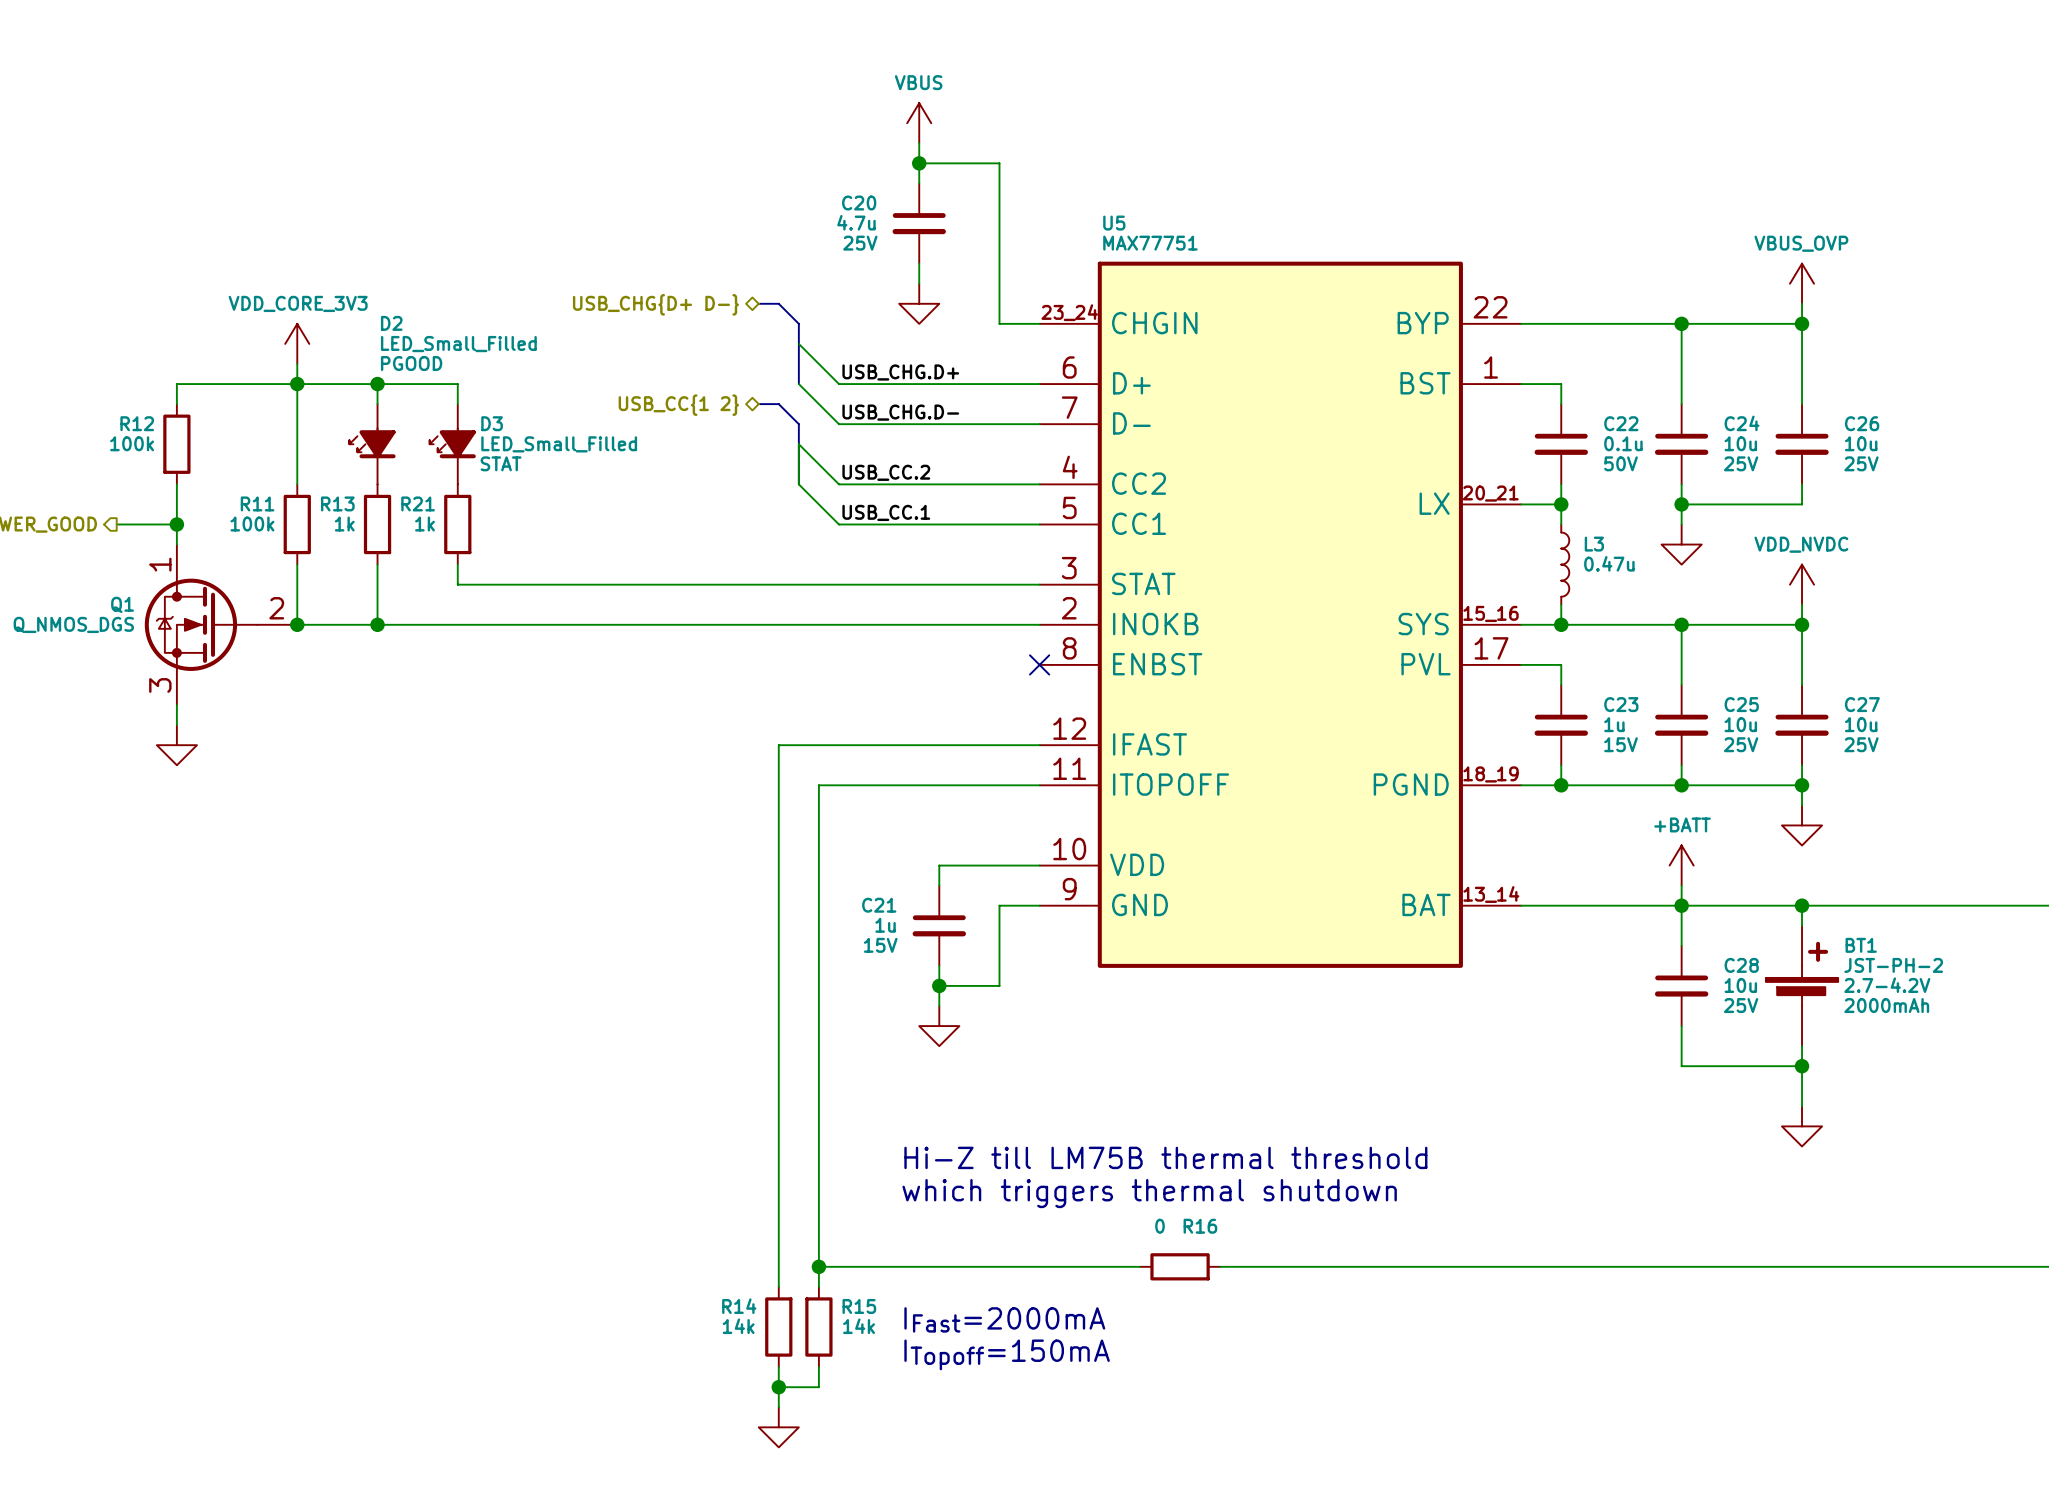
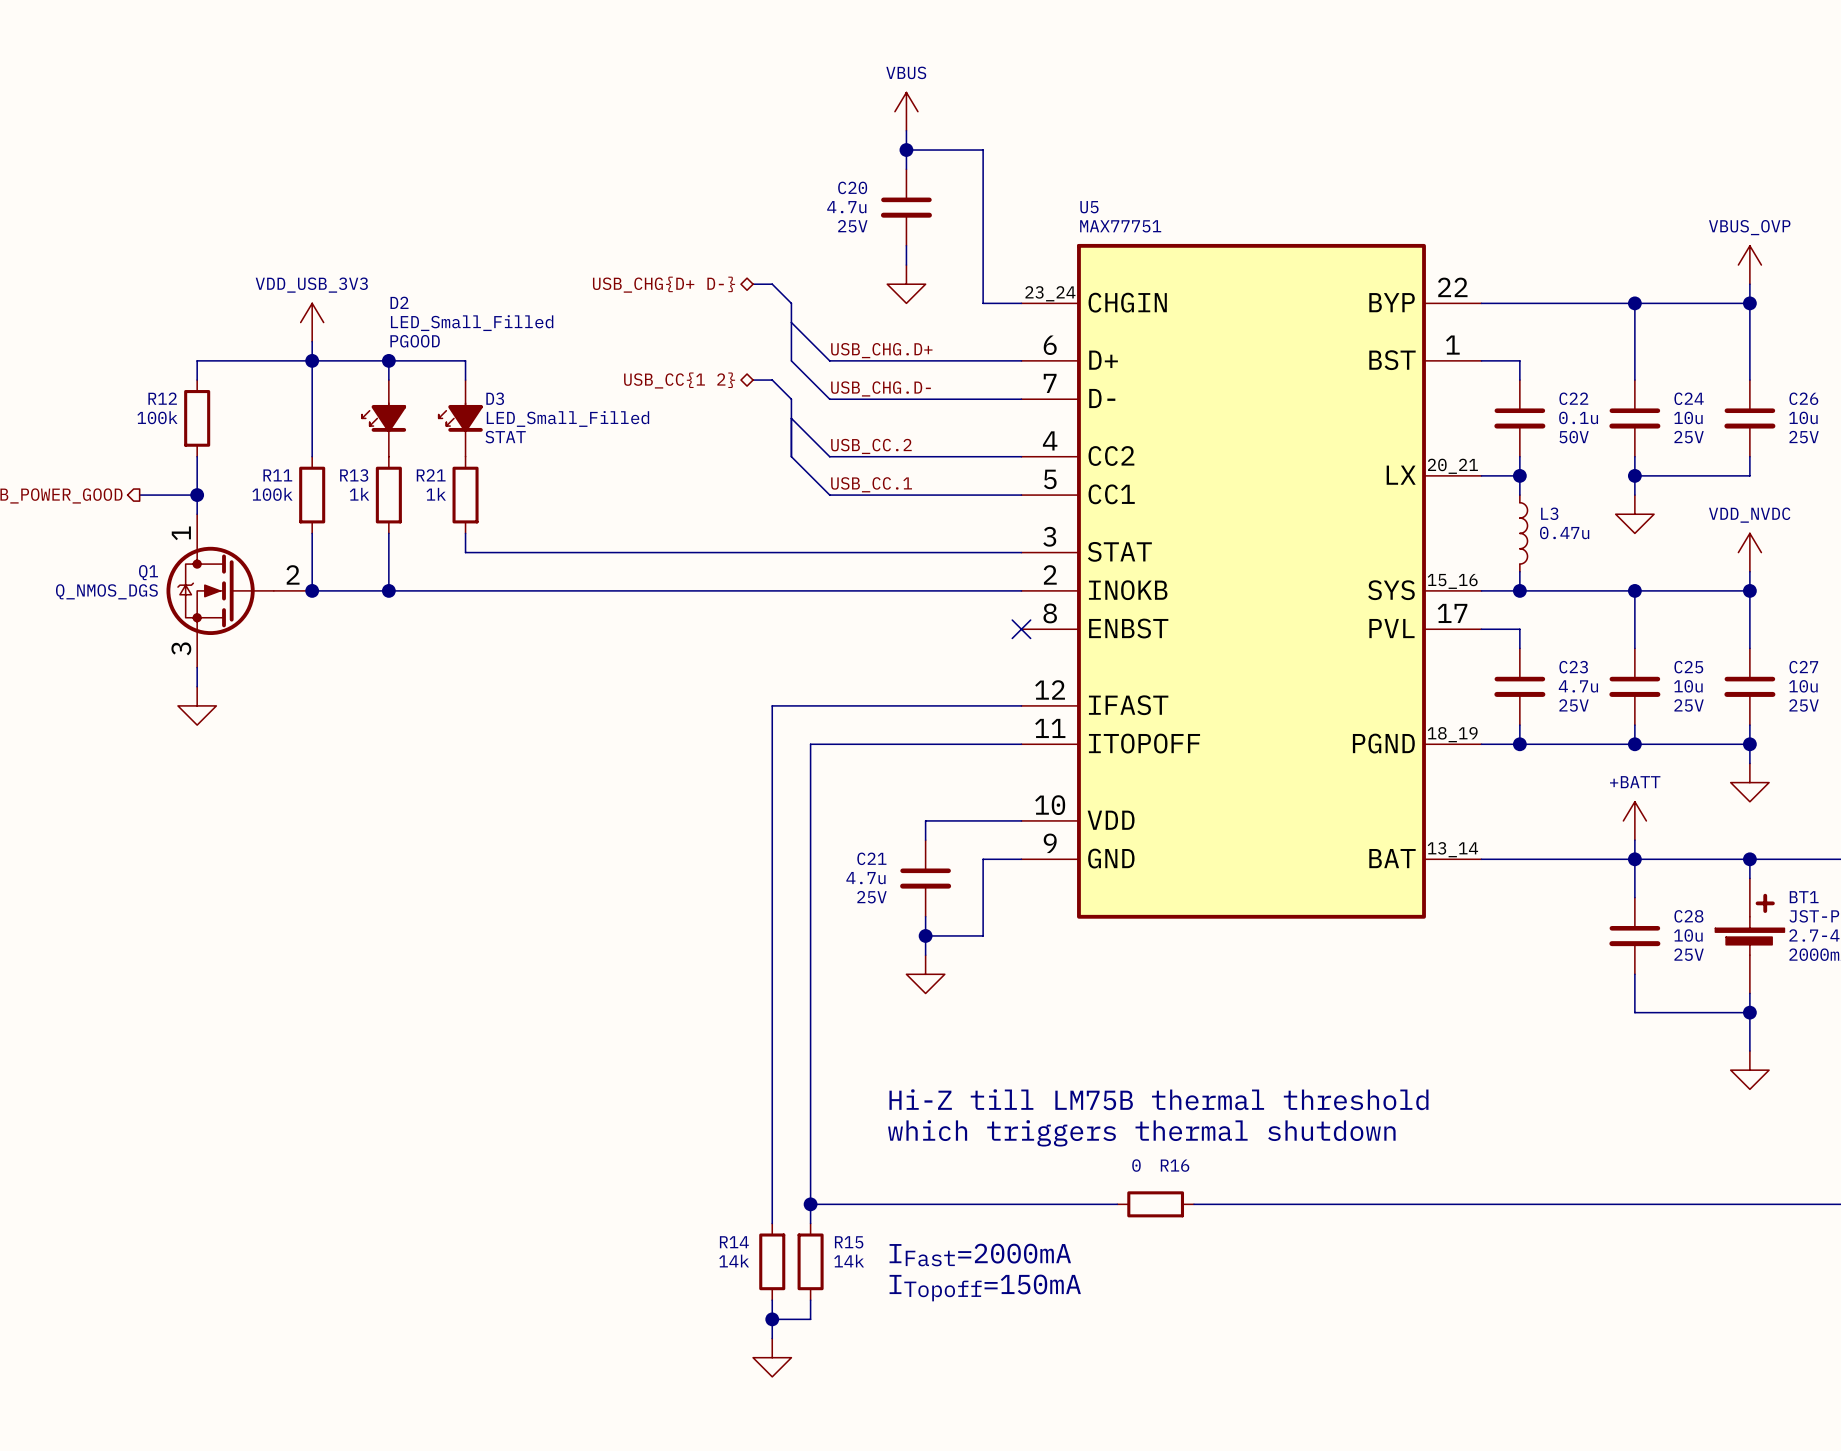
power symbol: VDD_CORE_3V3 (297, 343) -> VDD_USB_3V3 (312, 322)
C23 value: 1u (1614, 724) -> 4.7u (1578, 686)
C23 text: 15V (1621, 744) -> 25V (1574, 705)
C21 value: 1u (885, 925) -> 4.7u (865, 878)
C21 text: 15V (880, 945) -> 25V (871, 897)

